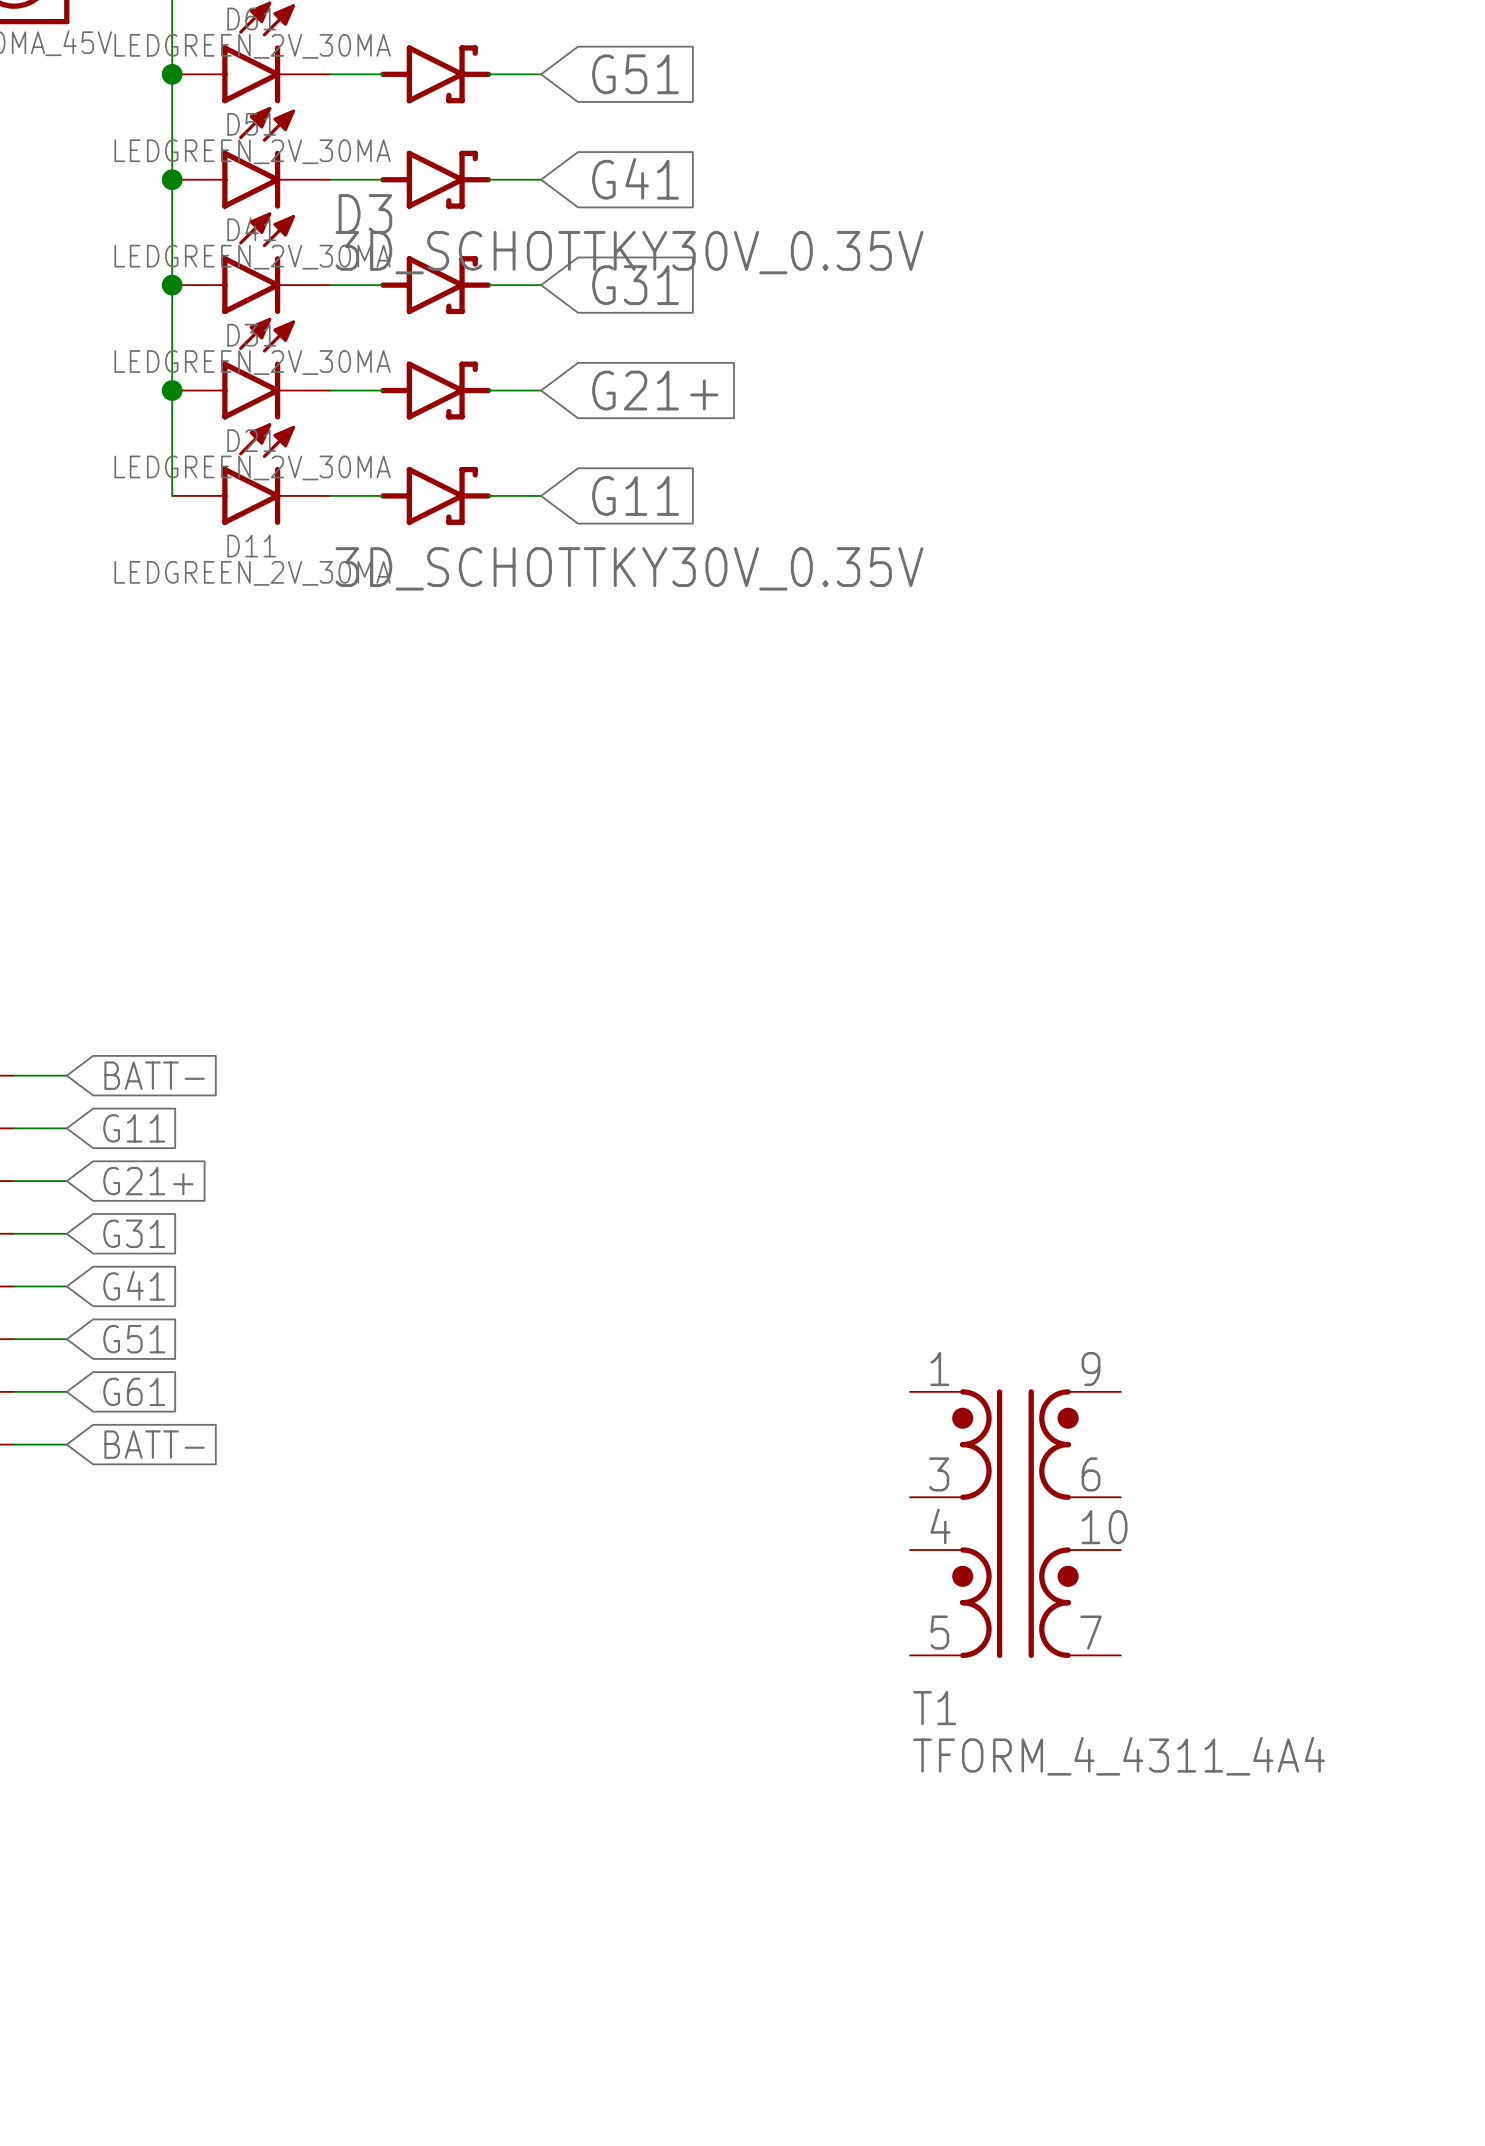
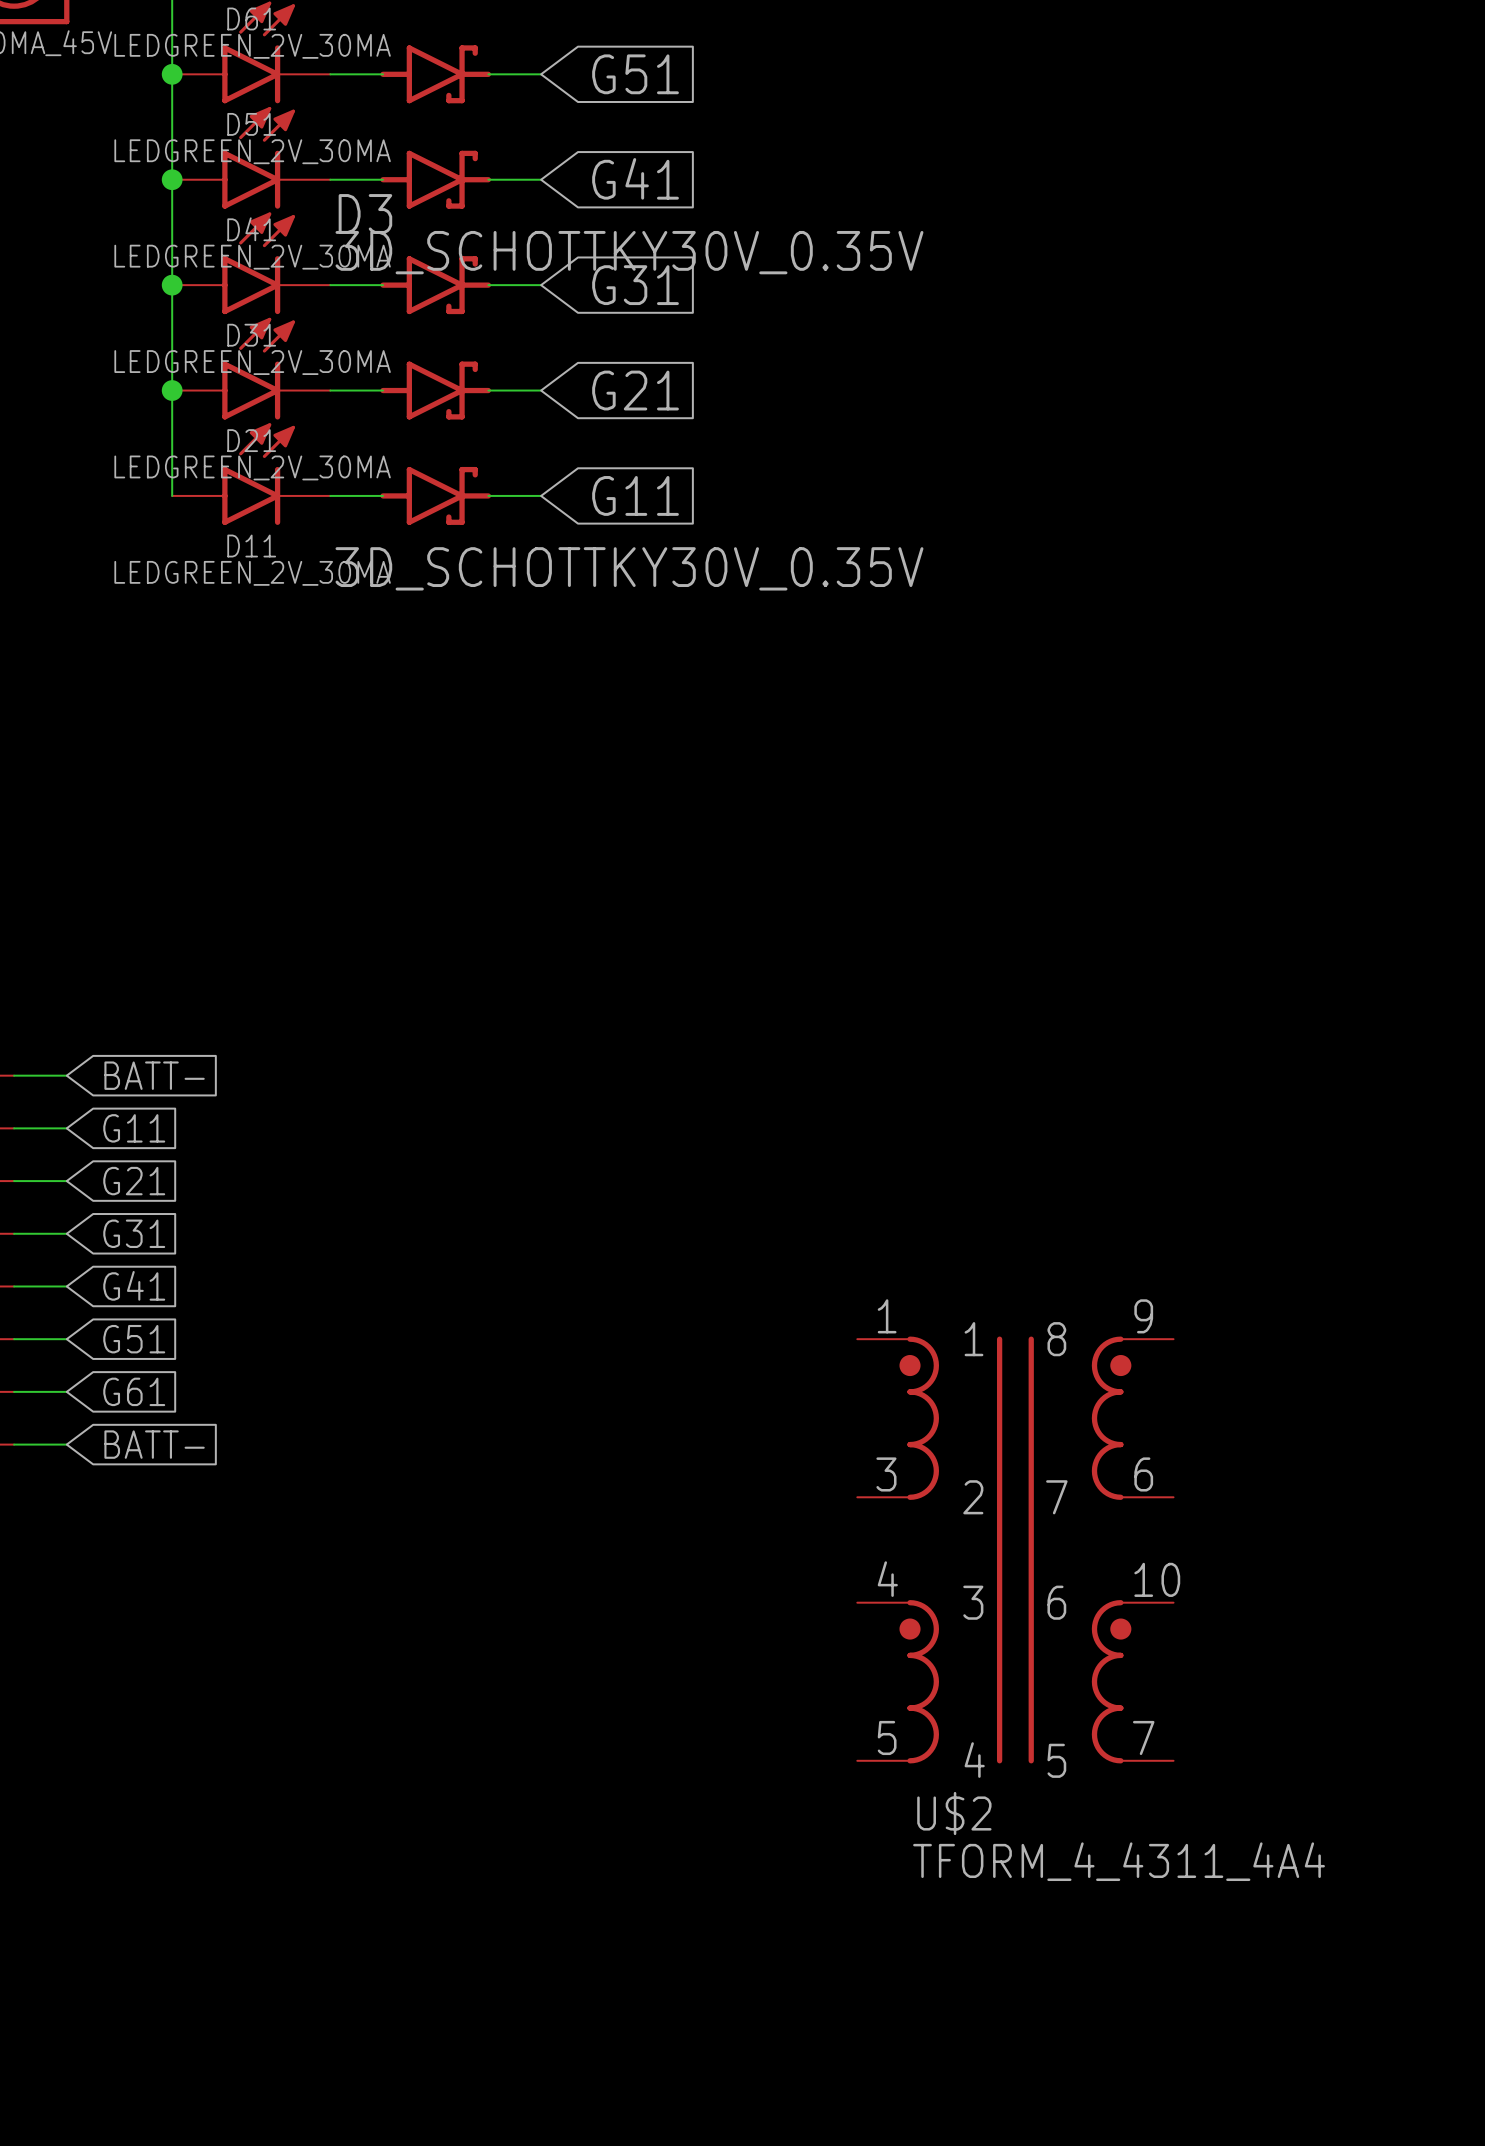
global label: G21+ (655, 390) -> G21 (635, 390)
global label: G21+ (148, 1181) -> G21 (134, 1181)
T1: TFORM_4_4311_4A4 (1015, 1523) -> none
U$2: none -> TFORM_4_4311_4A4 (1015, 1549)

